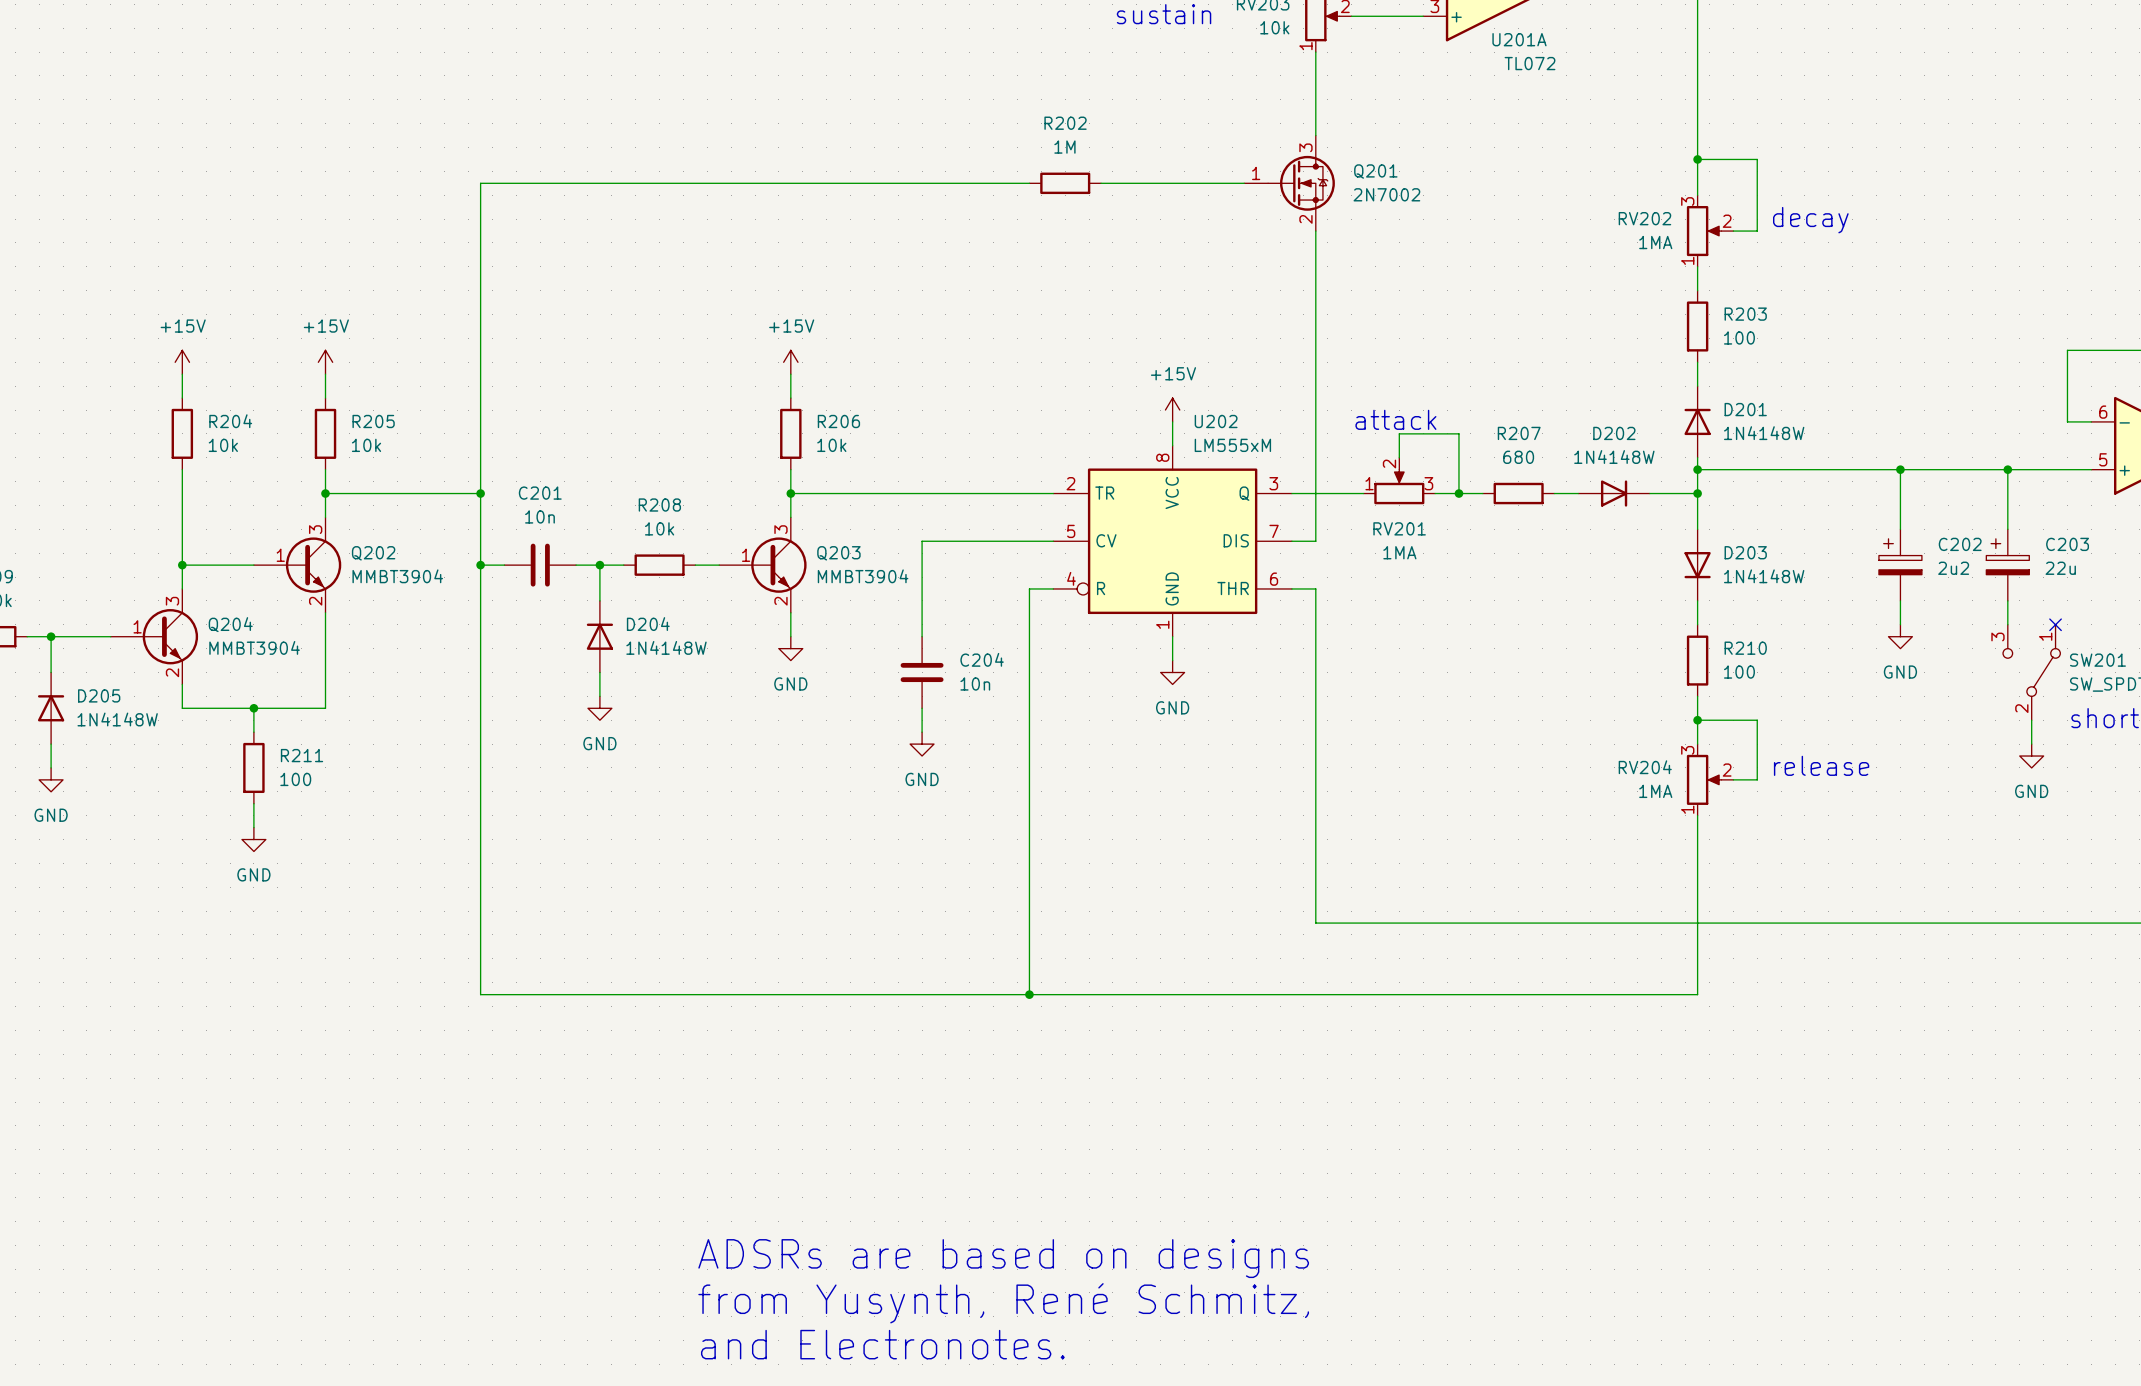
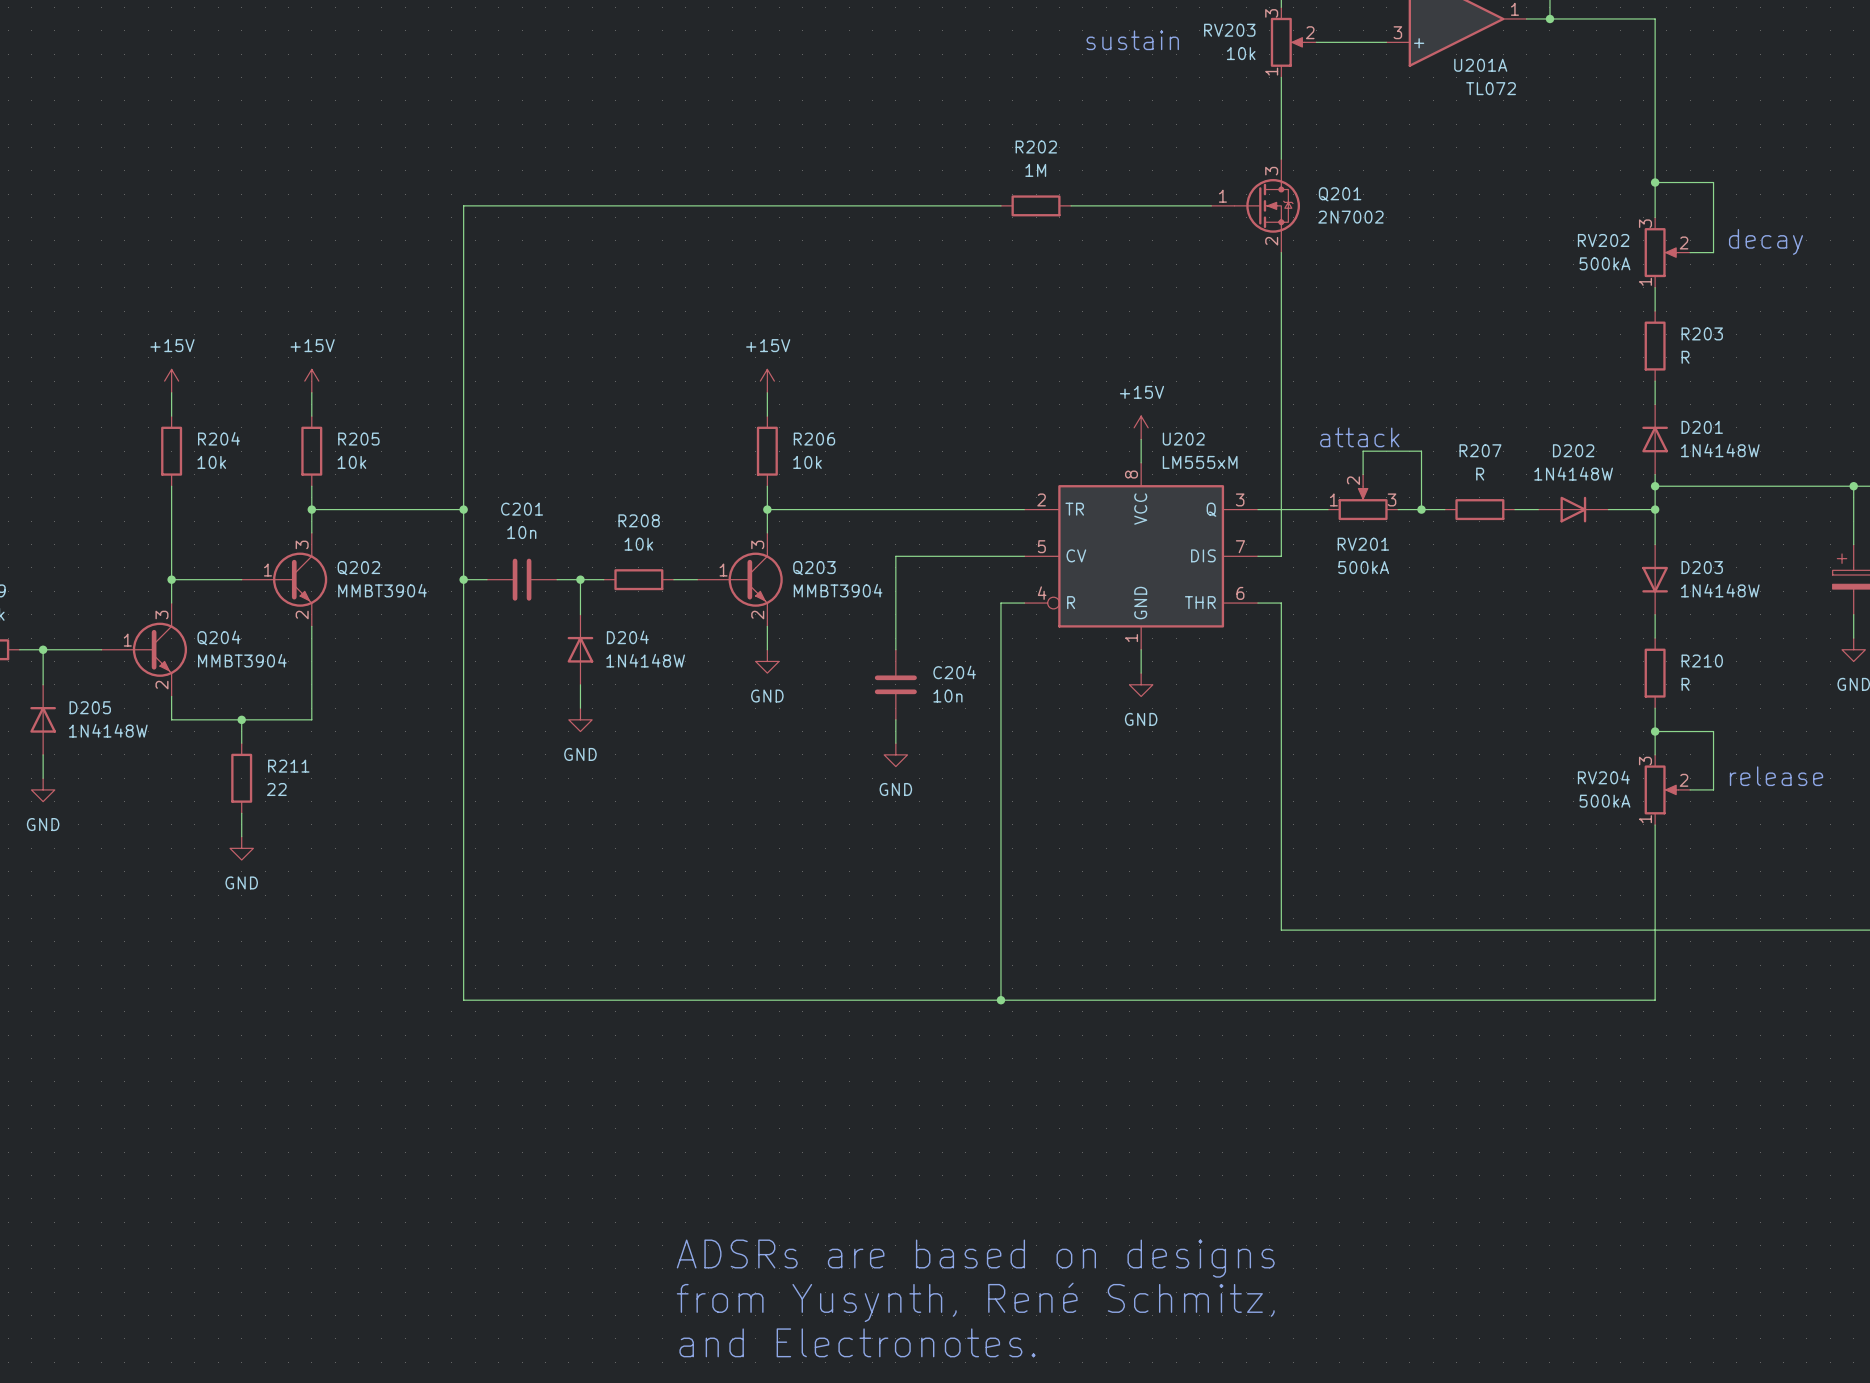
RV202 value: 1MA (1655, 242) -> 500kA (1604, 263)
R203 value: 100 (1739, 337) -> R (1685, 357)
R207 value: 680 (1518, 457) -> R (1480, 474)
RV201 value: 1MA (1399, 552) -> 500kA (1363, 567)
R210 value: 100 (1739, 672) -> R (1685, 684)
R211 value: 100 (295, 779) -> 22 (276, 789)
RV204 value: 1MA (1655, 791) -> 500kA (1604, 801)

